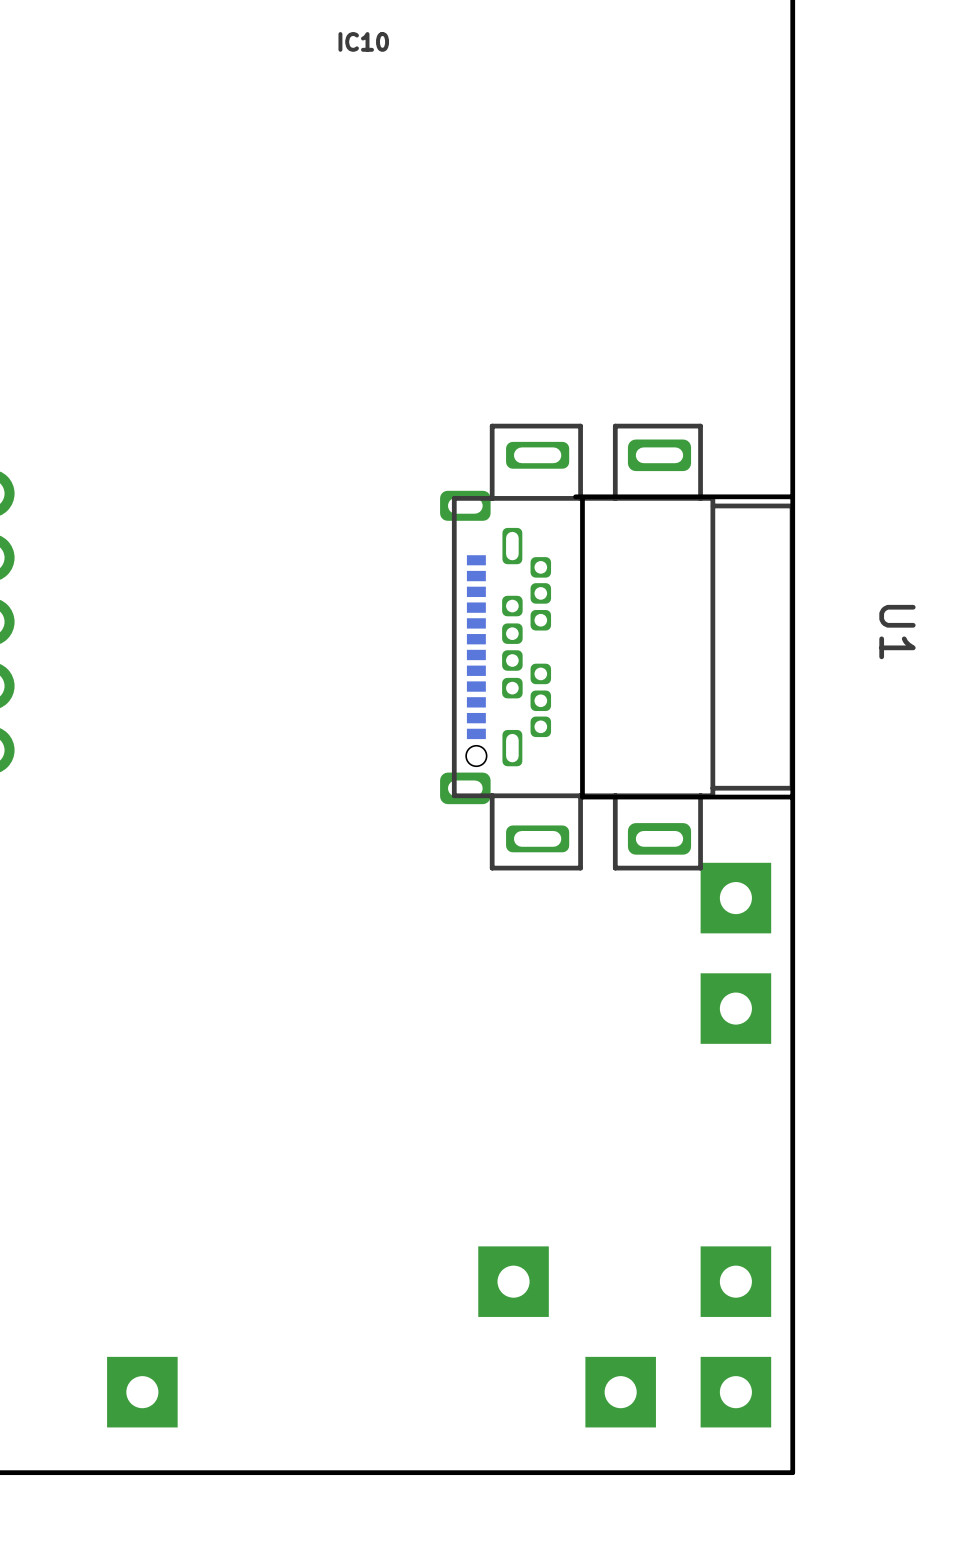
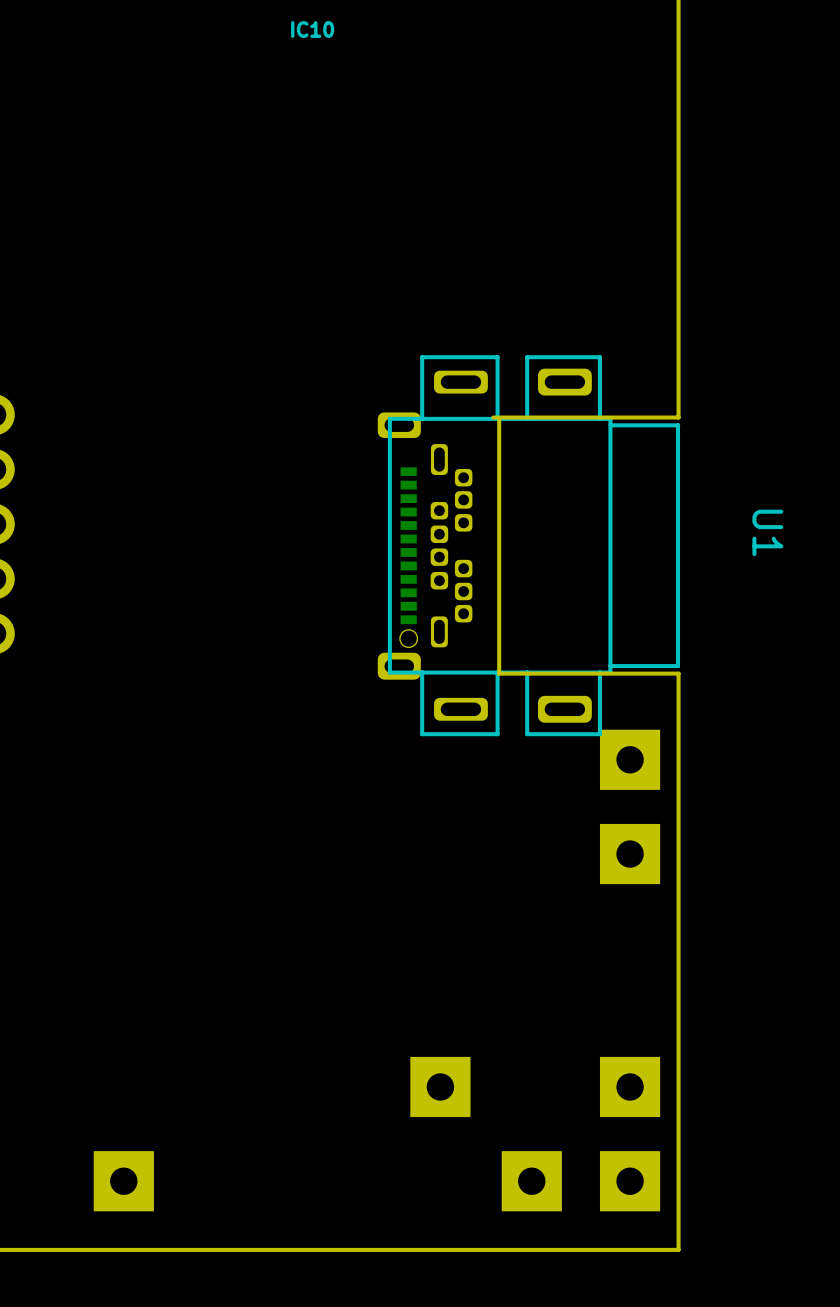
board edge: (792, 496) (792, 797) -> none

